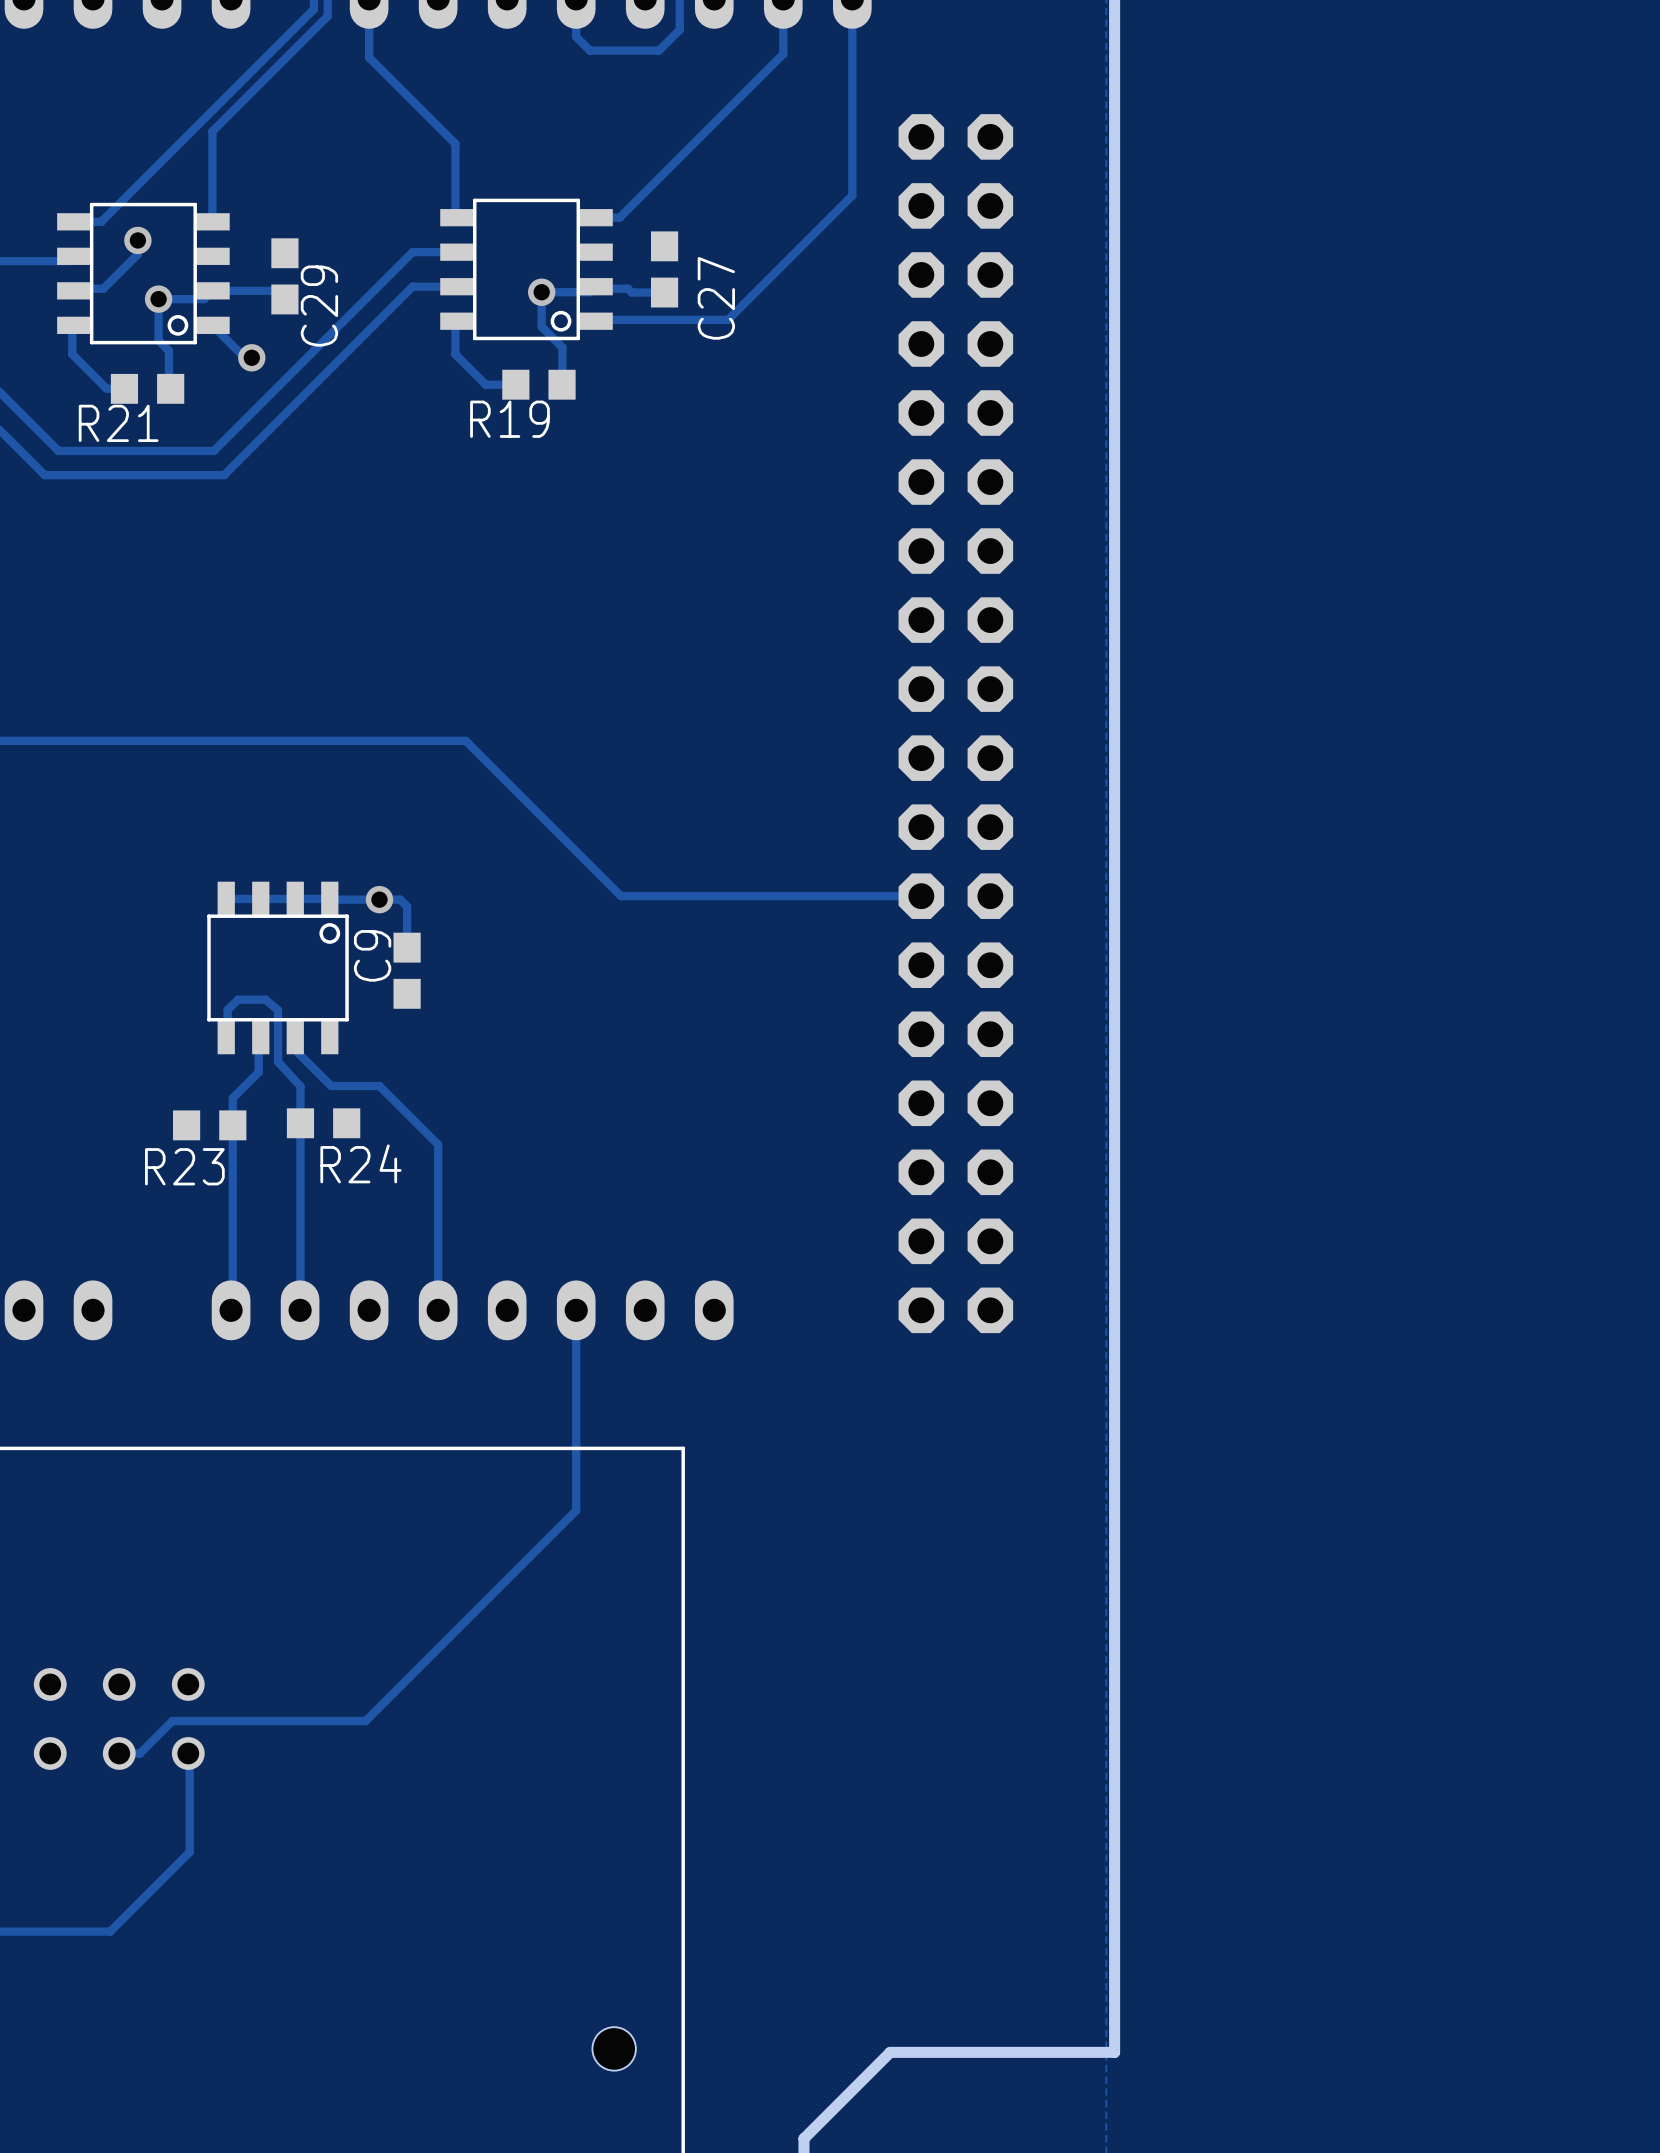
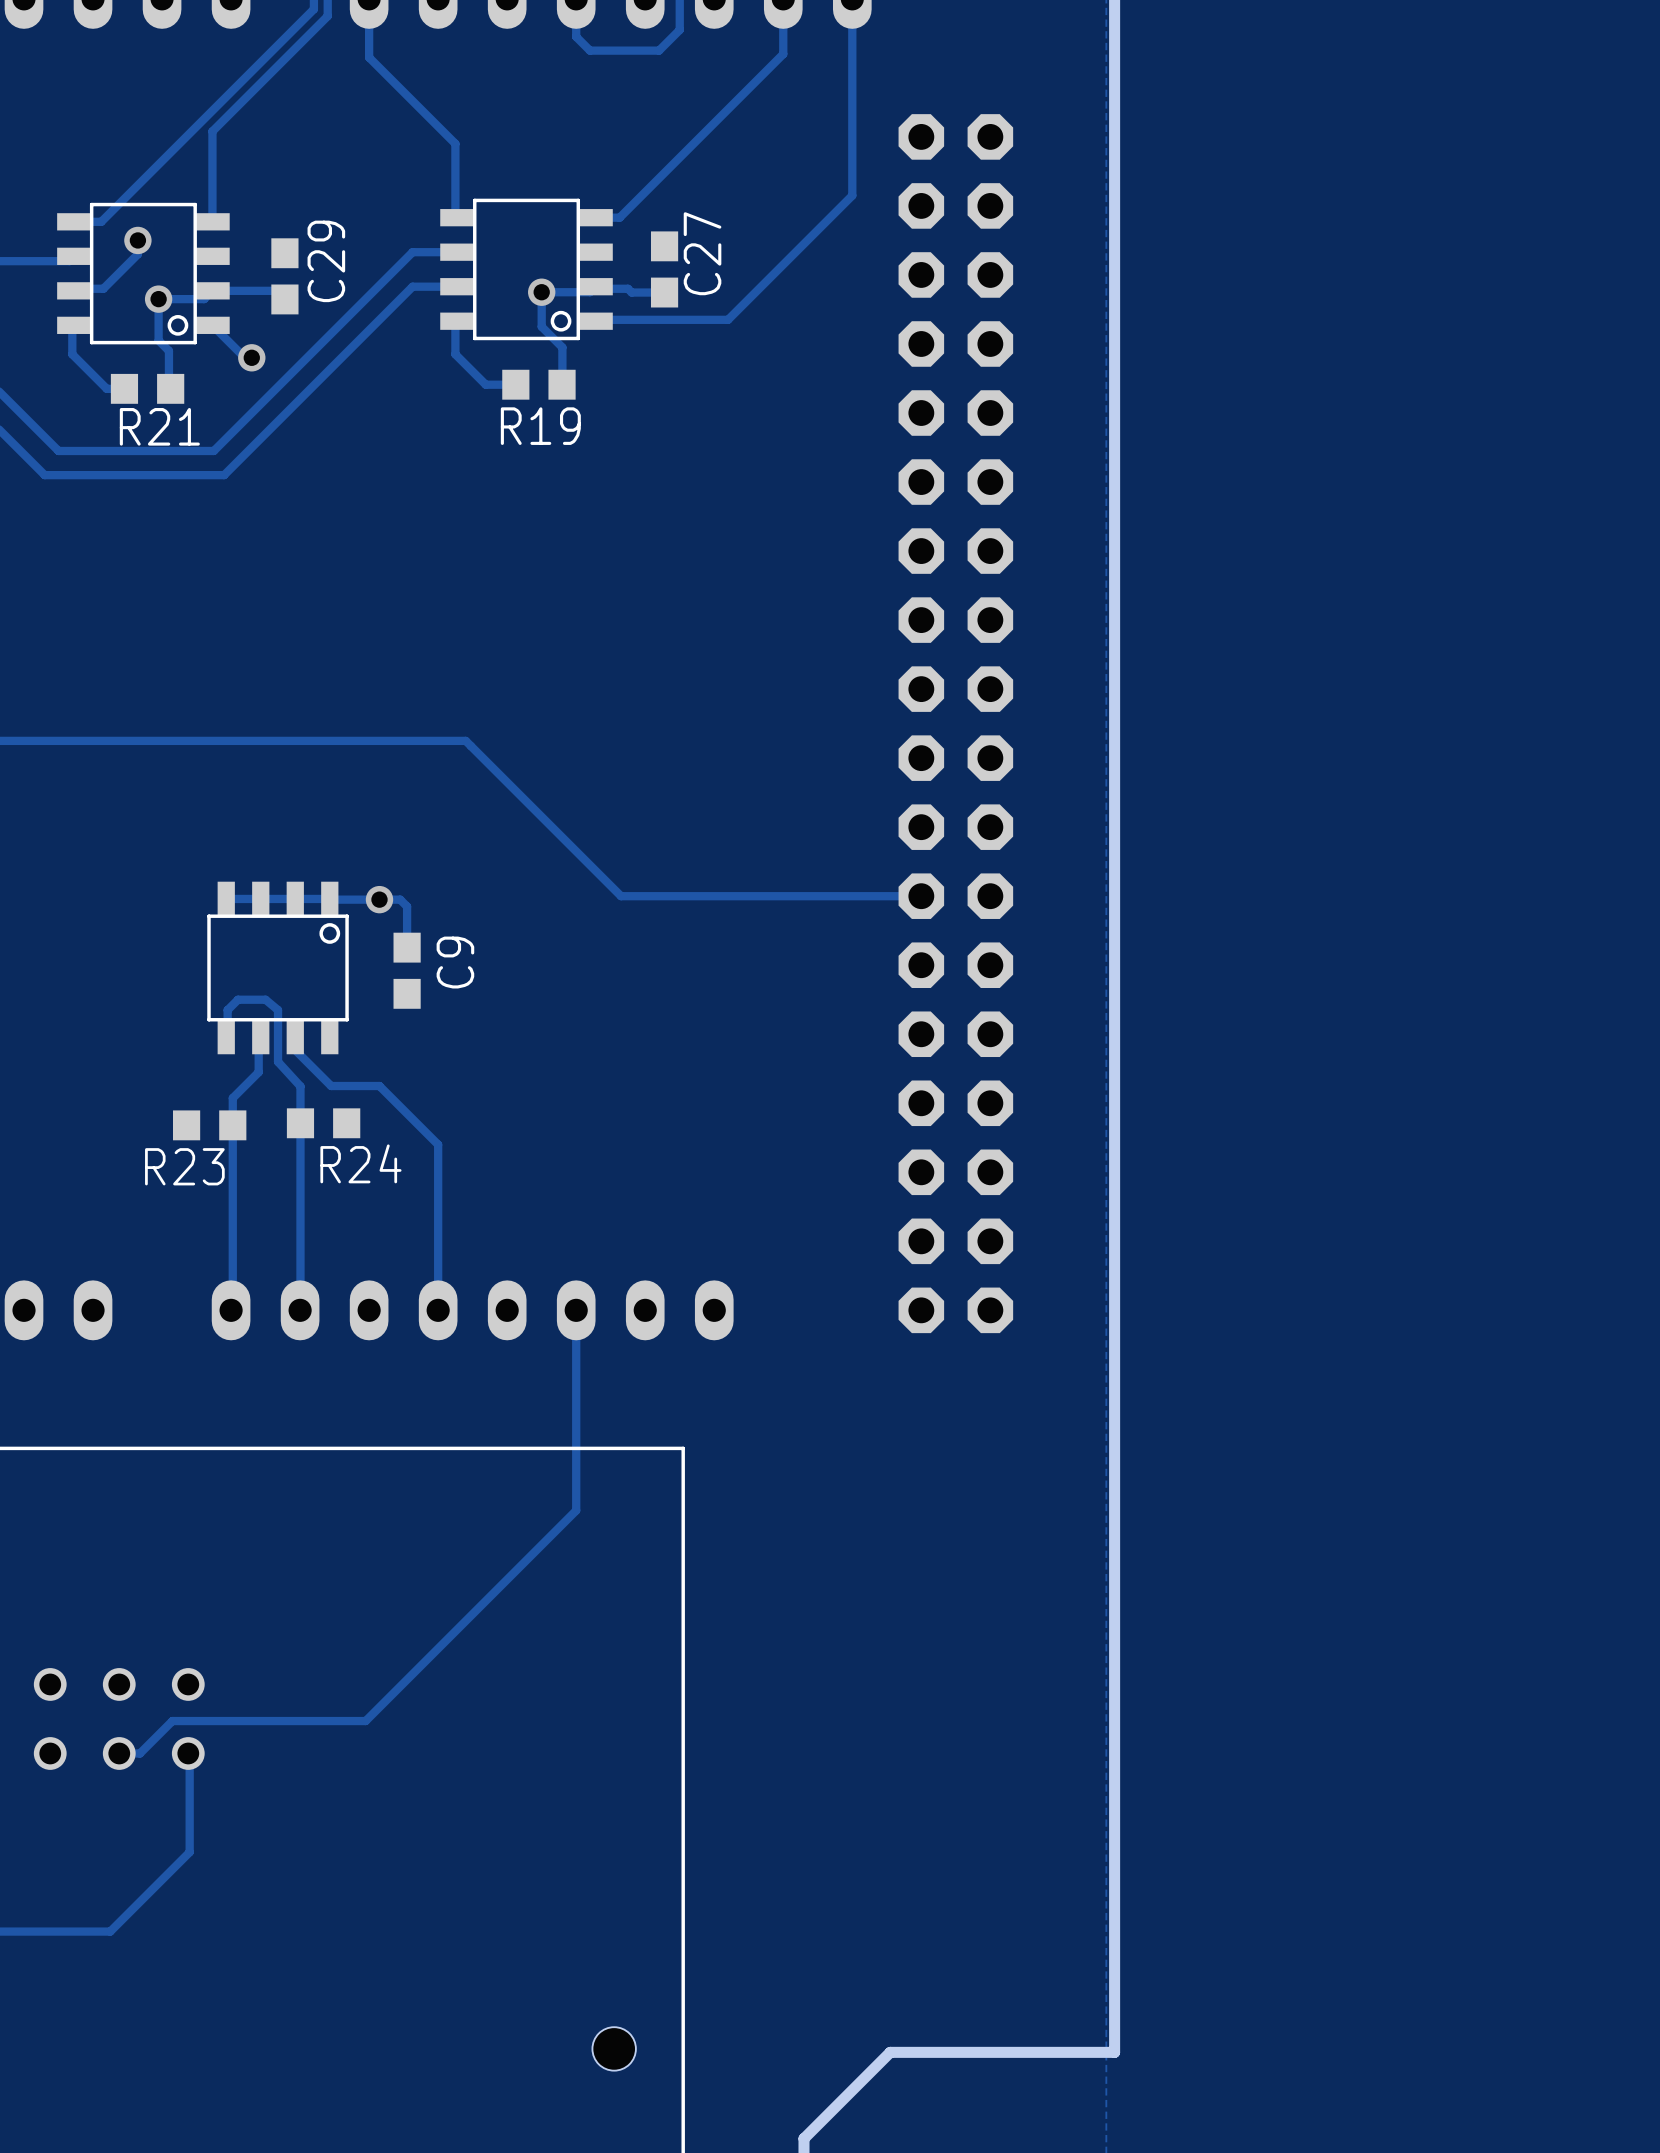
C27 name position: C27 (716, 298) -> C27 (702, 253)
C29 name position: C29 (319, 306) -> C29 (326, 261)
R19 name position: R19 (510, 419) -> R19 (540, 426)
R21 name position: R21 (118, 423) -> R21 (159, 426)
C9 name position: C9 (372, 955) -> C9 (455, 962)

